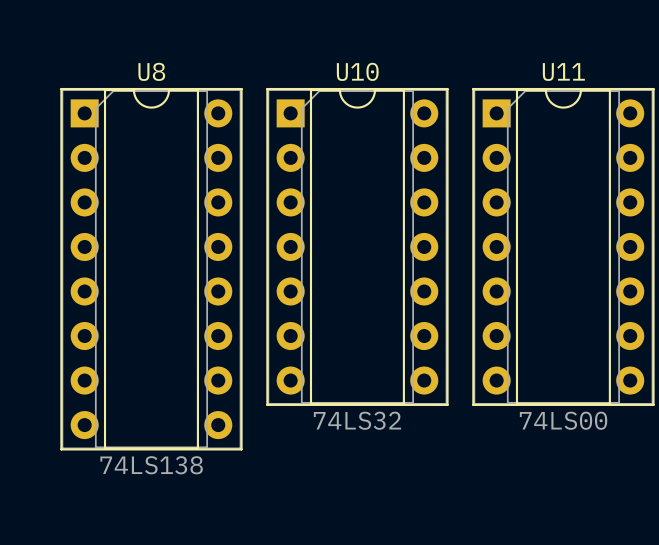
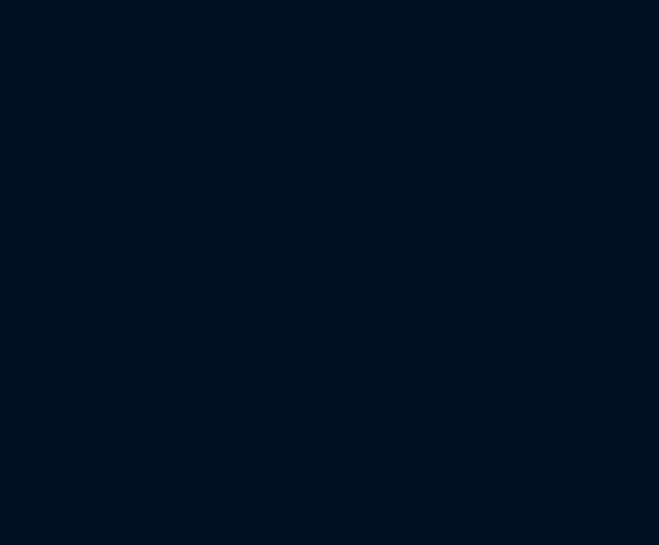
U10: 74LS32 (357, 246) -> none
U11: 74LS00 (563, 246) -> none
U8: 74LS138 (151, 269) -> none

